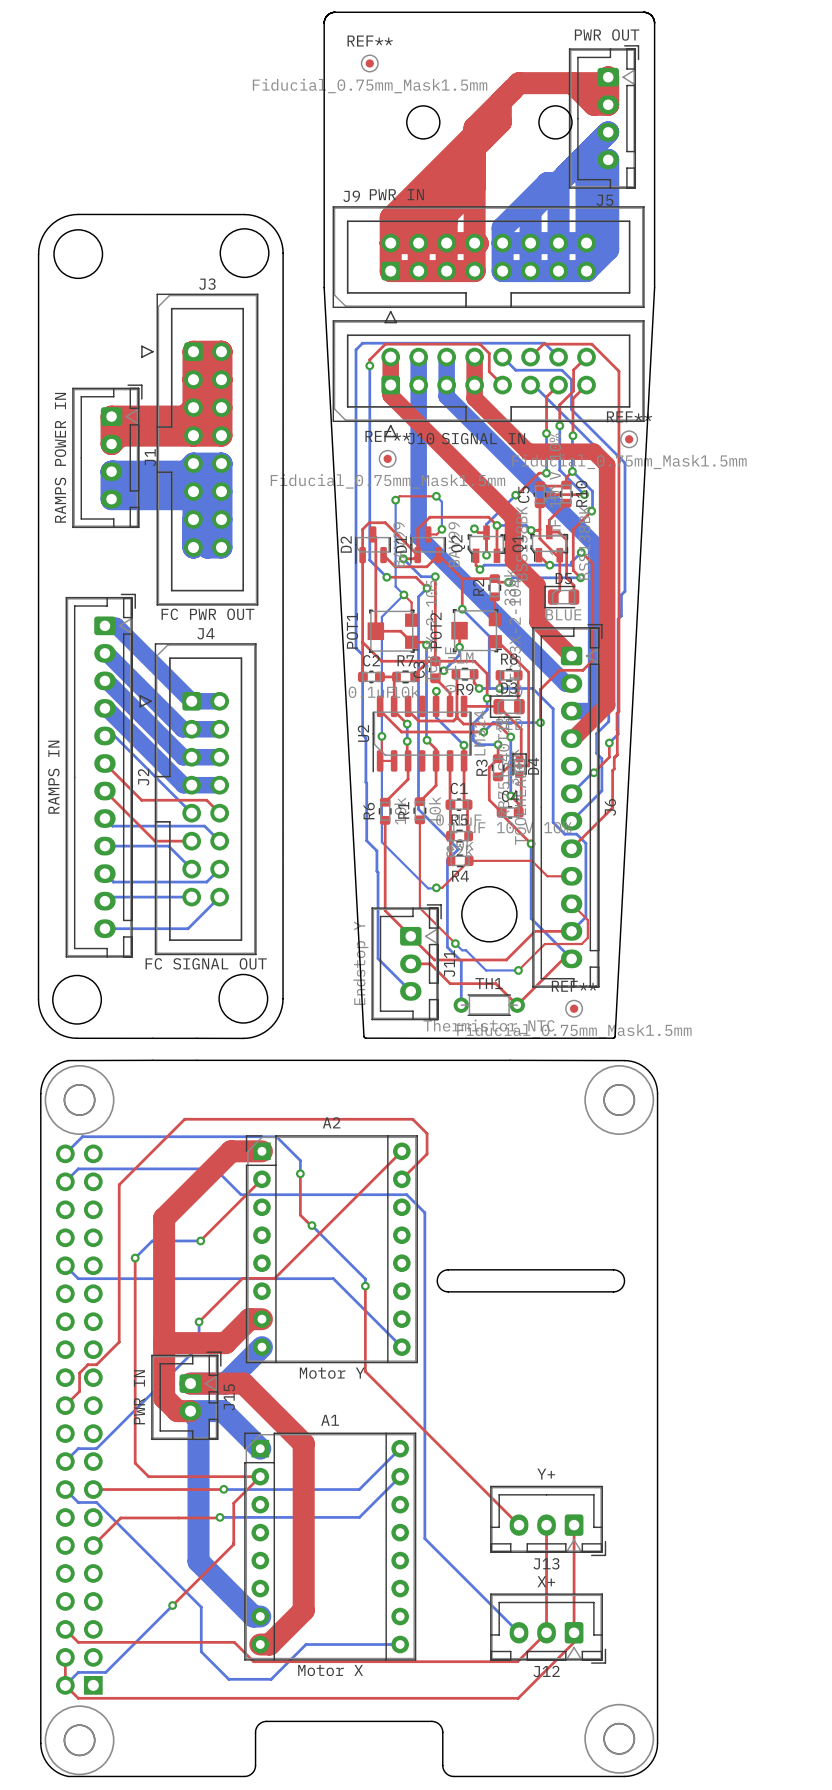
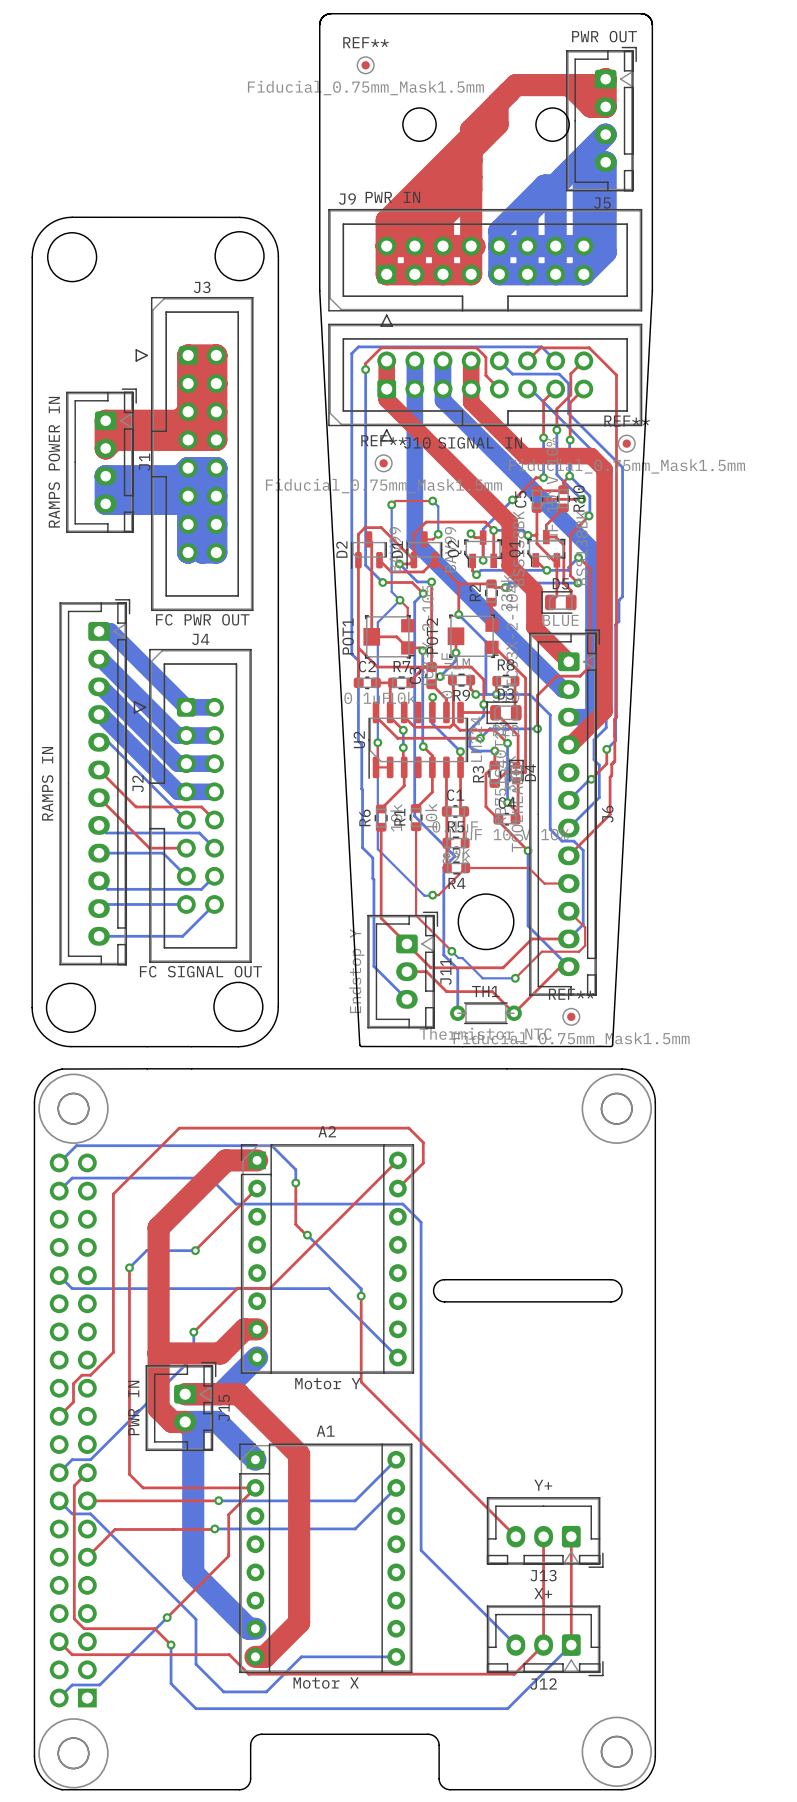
top track: none -> (87, 1472) (74, 1485) (74, 1618) (84, 1628) (154, 1628) (171, 1644)
bottom track: none -> (171, 1644) (171, 1683) (196, 1708) (507, 1708) (571, 1645)
via: none -> (171, 1644)
top track: (574, 1642) (518, 1698) (78, 1698) (65, 1685) (65, 1657) -> none

